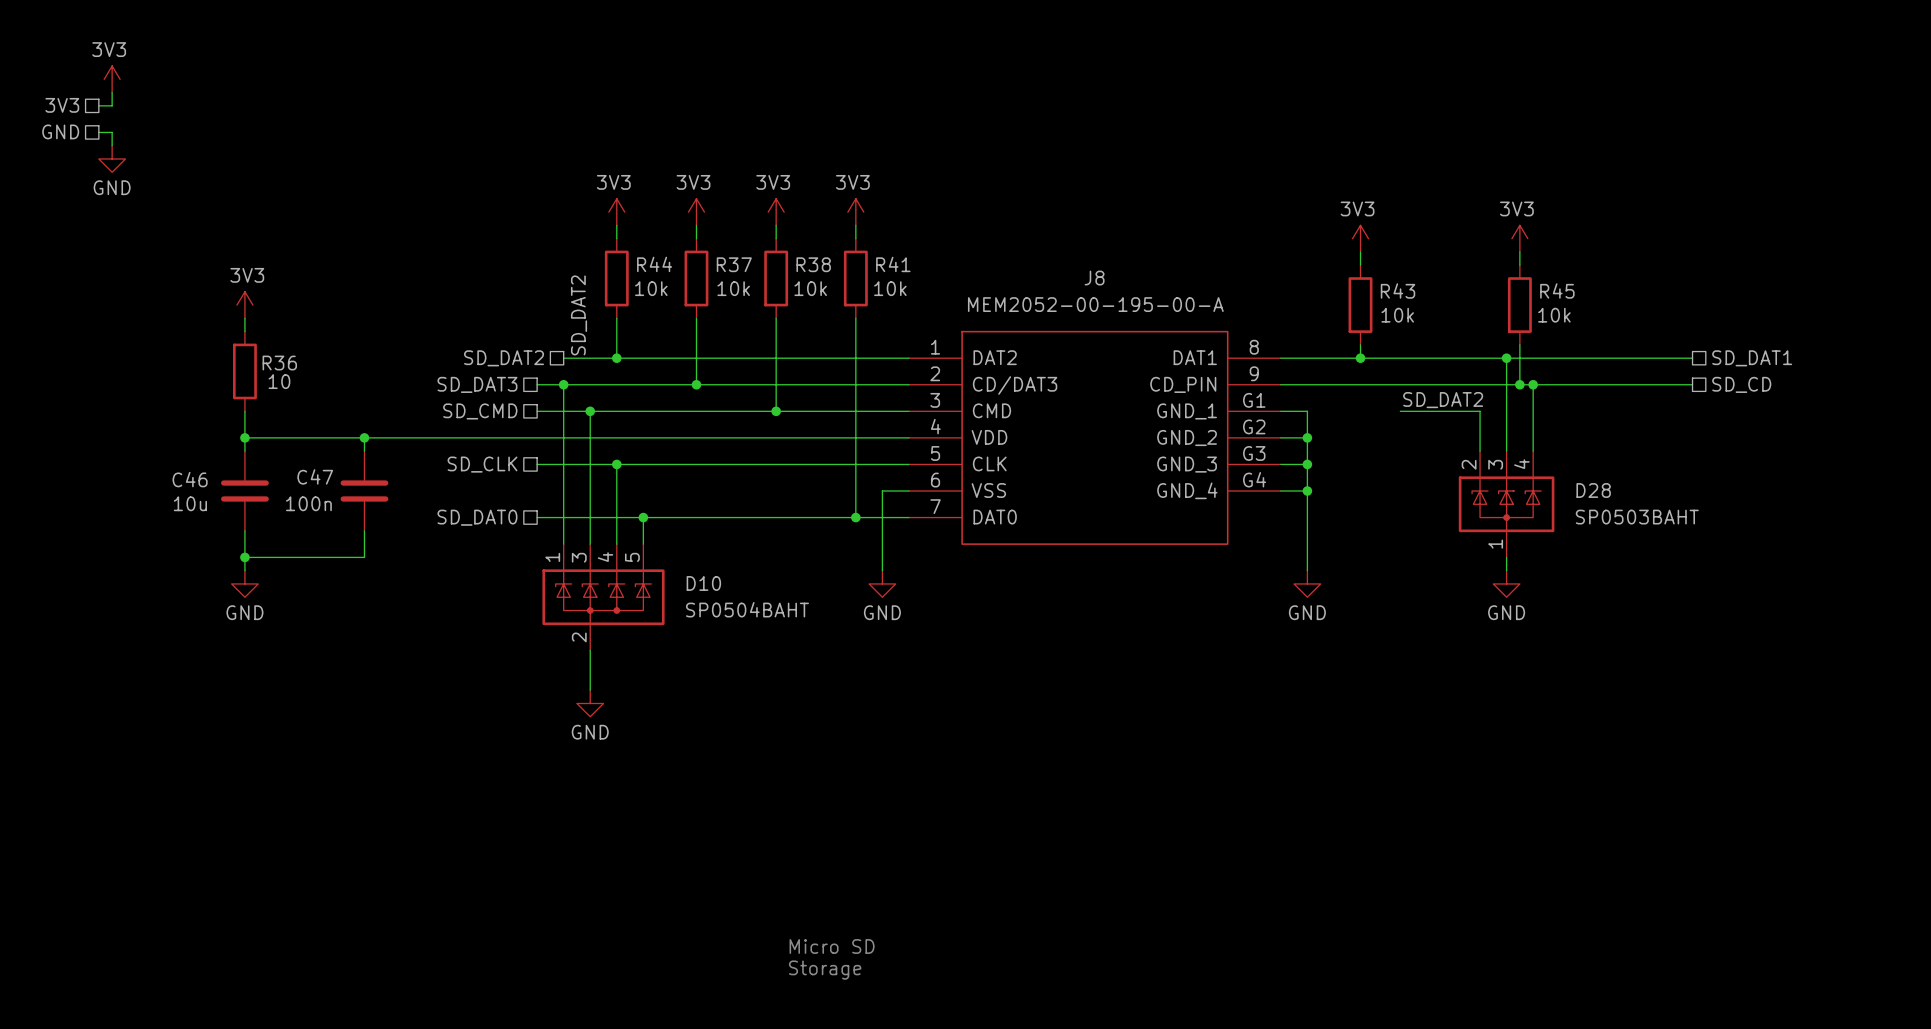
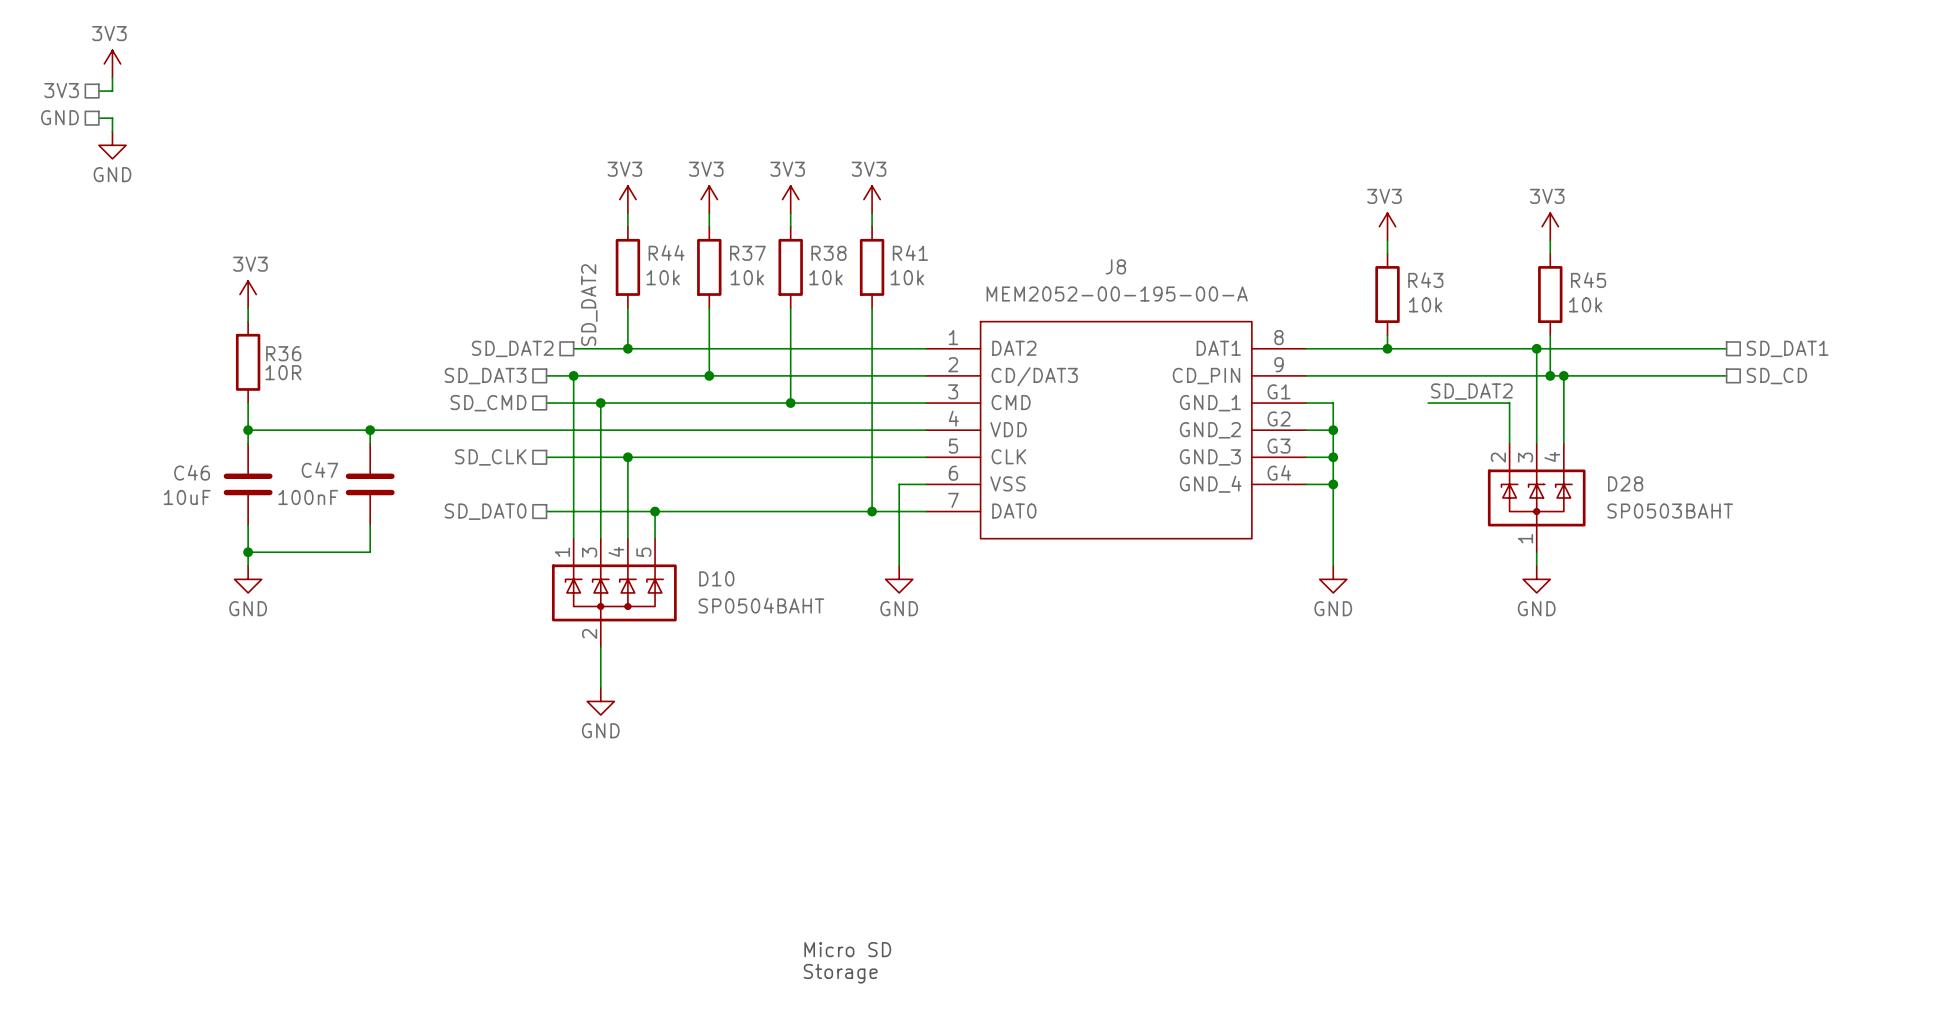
R36 value: 10 (279, 381) -> 10R (283, 372)
C46 value: 10u (190, 503) -> 10uF (187, 497)
C47 value: 100n (308, 503) -> 100nF (308, 497)

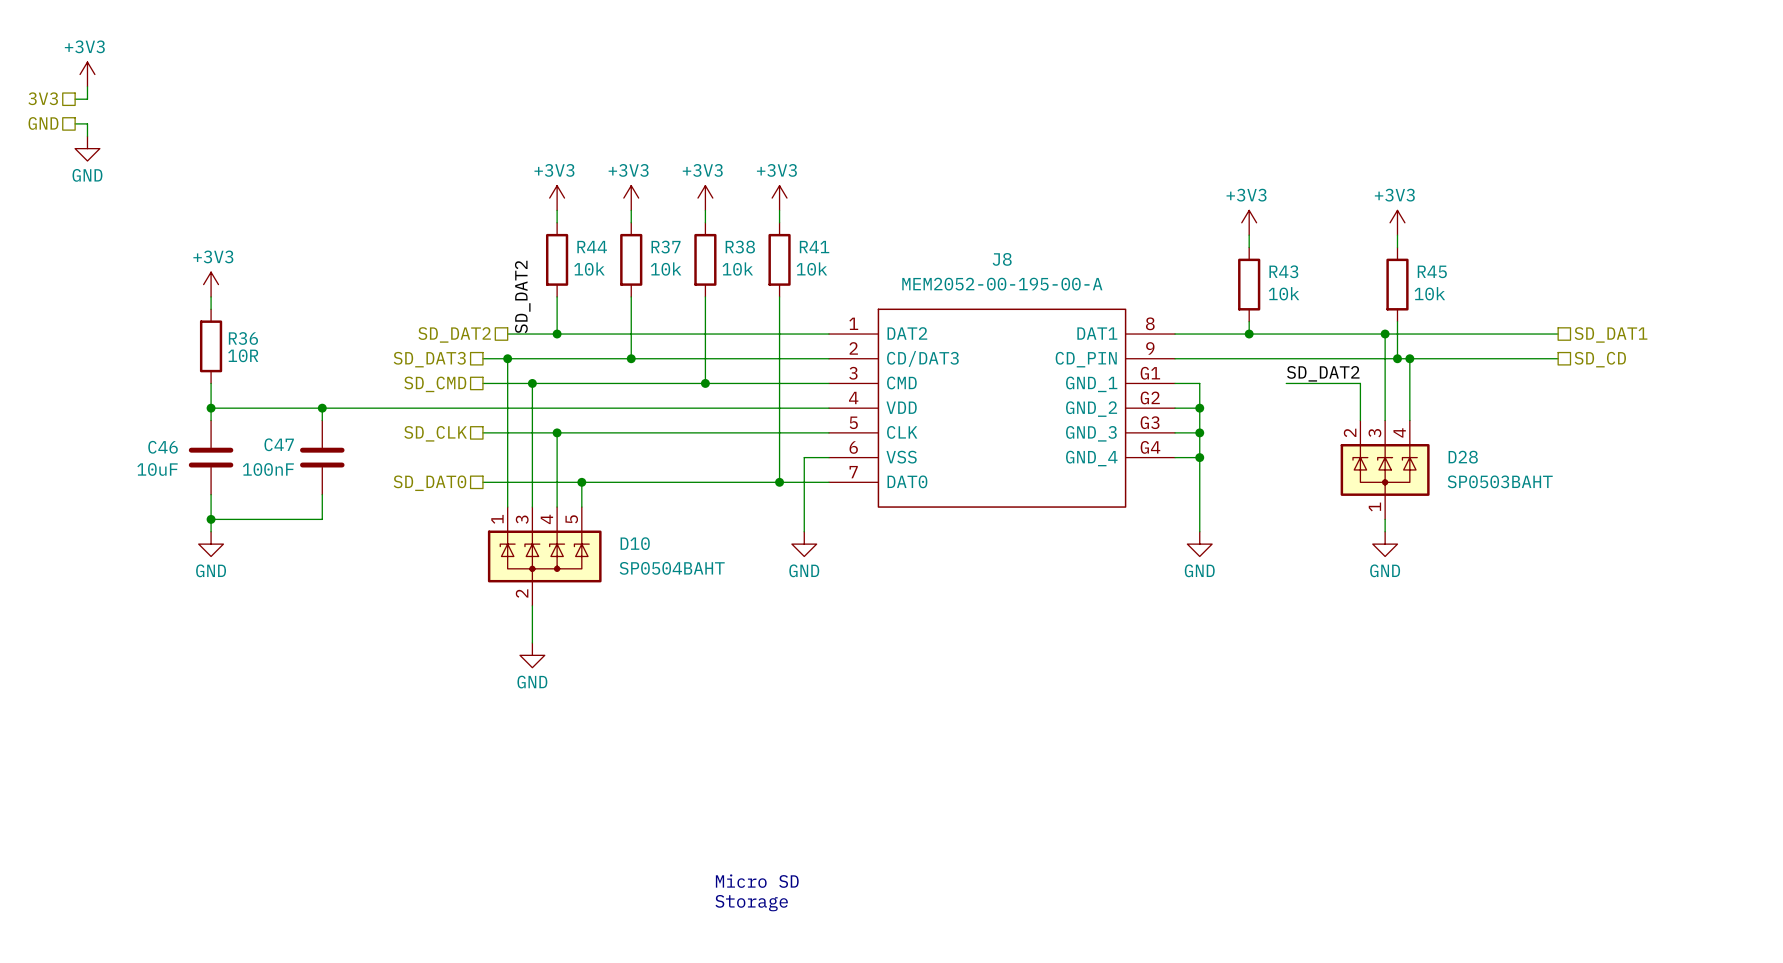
power symbol: 3V3 (112, 63) -> +3V3 (87, 74)
power symbol: 3V3 (627, 199) -> +3V3 (557, 198)
power symbol: 3V3 (709, 199) -> +3V3 (631, 198)
power symbol: 3V3 (790, 199) -> +3V3 (705, 198)
power symbol: 3V3 (872, 199) -> +3V3 (779, 198)
power symbol: 3V3 (1387, 226) -> +3V3 (1249, 222)
power symbol: 3V3 (1550, 226) -> +3V3 (1397, 222)
power symbol: 3V3 (248, 294) -> +3V3 (211, 284)

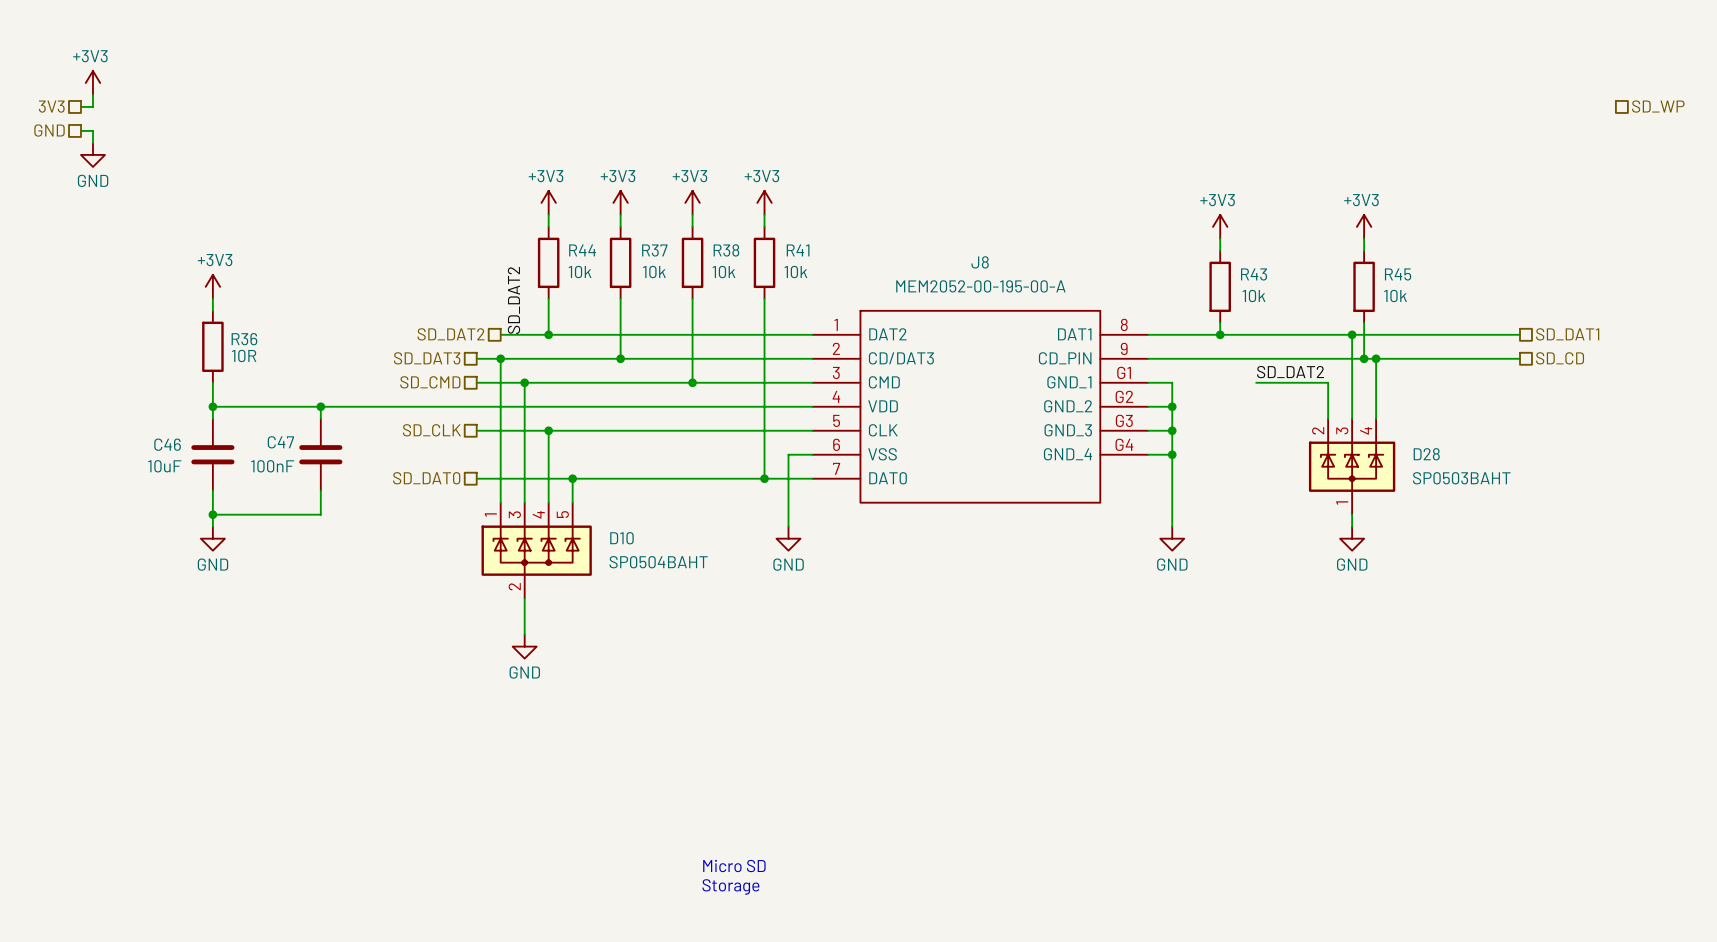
hierarchical label: none -> SD_WP (1658, 106)

